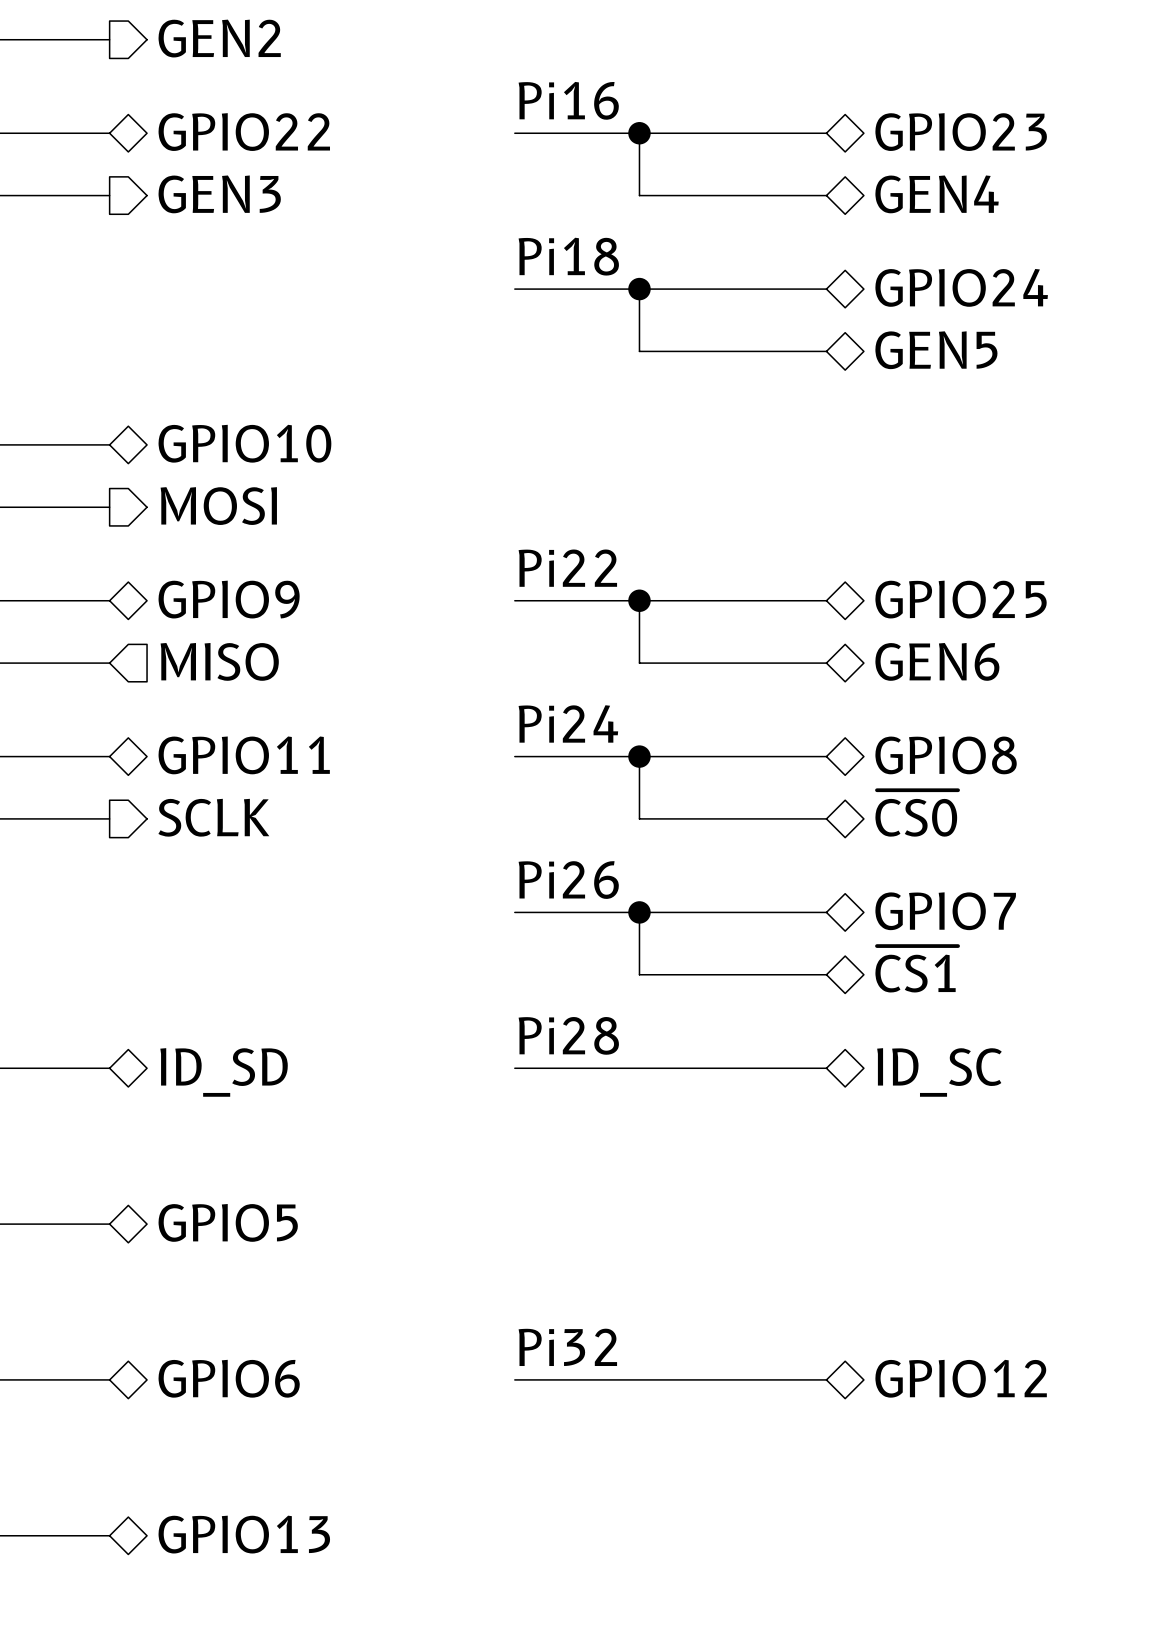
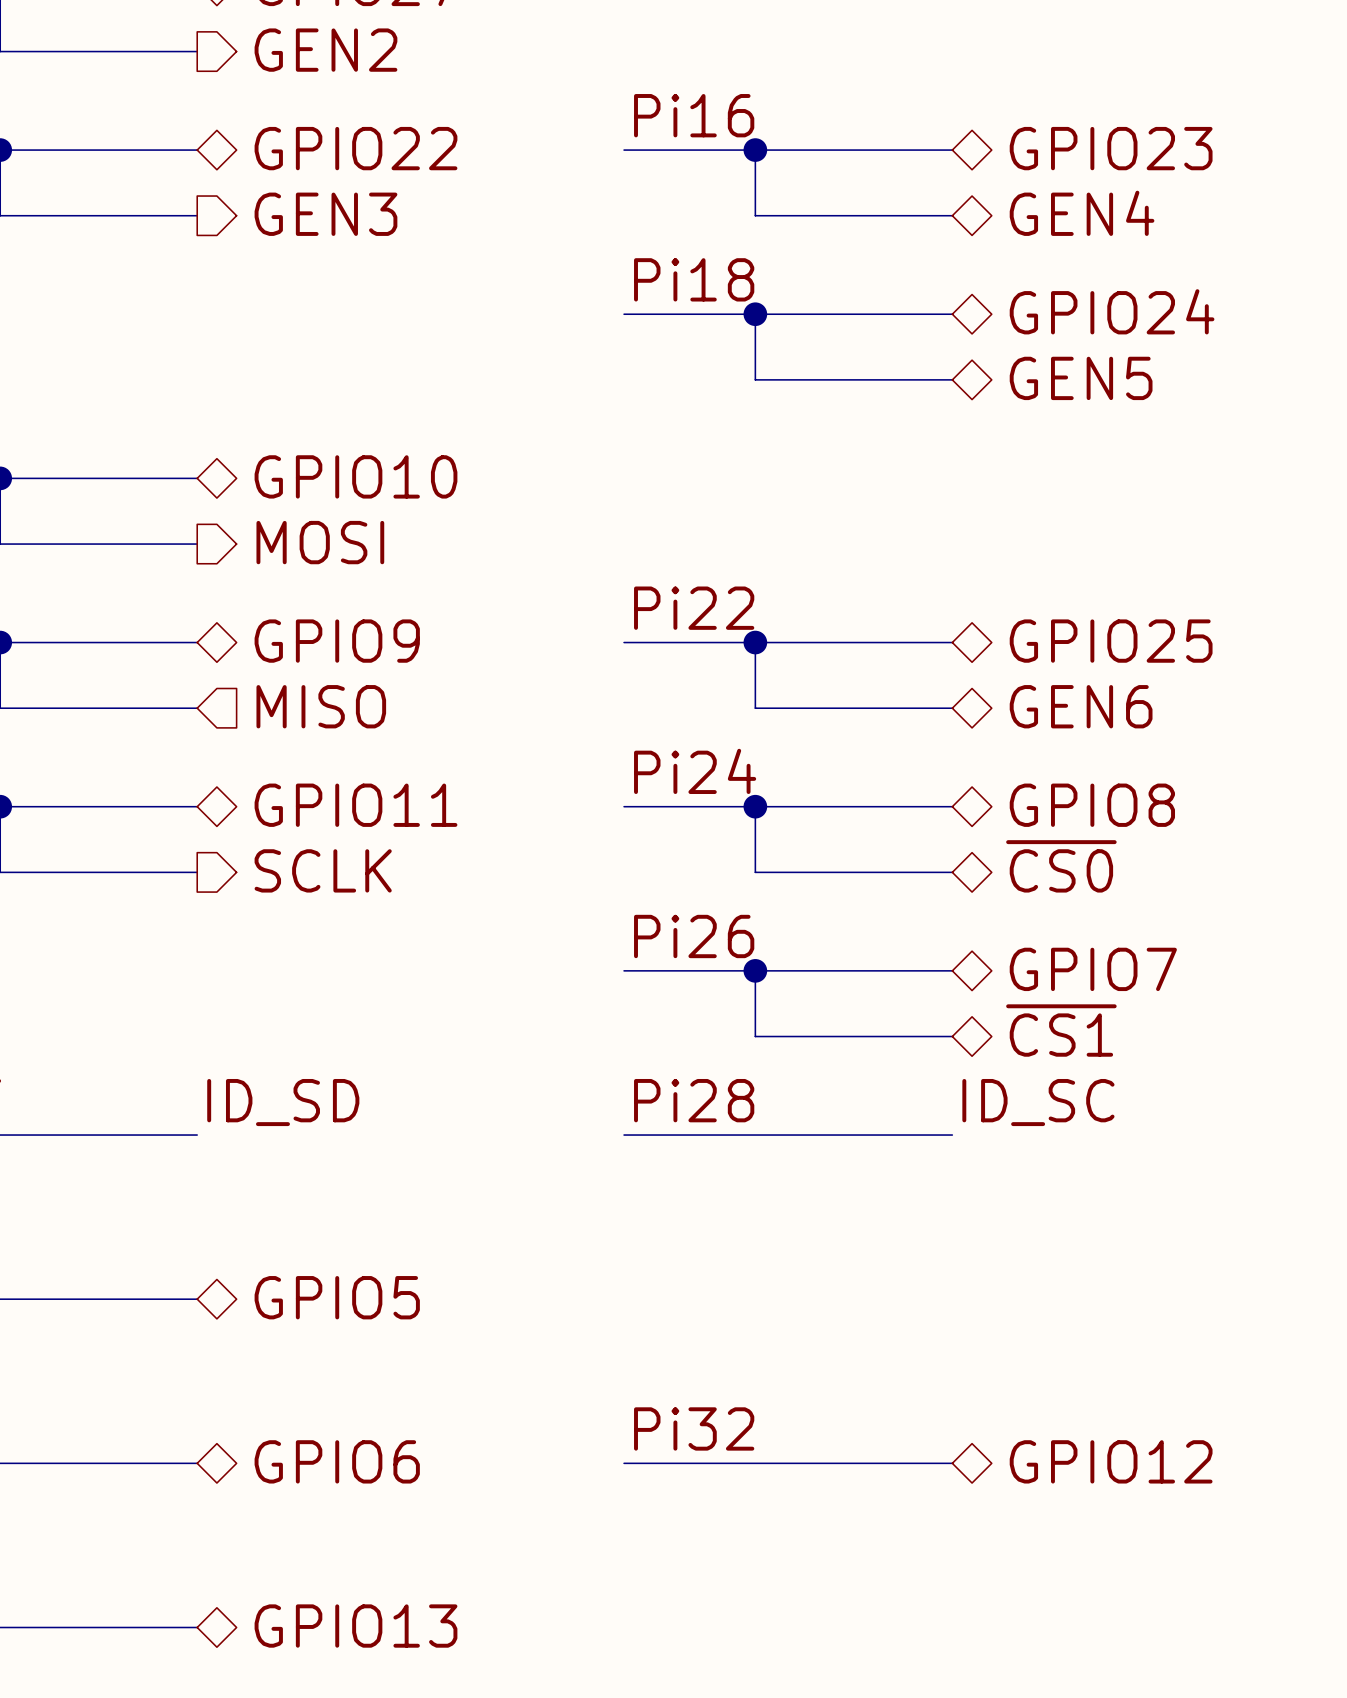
label: none -> ID_SD (283, 1102)
label: none -> ID_SC (1038, 1102)
hierarchical label: ID_SD (224, 1072) -> none
hierarchical label: ID_SC (939, 1072) -> none

